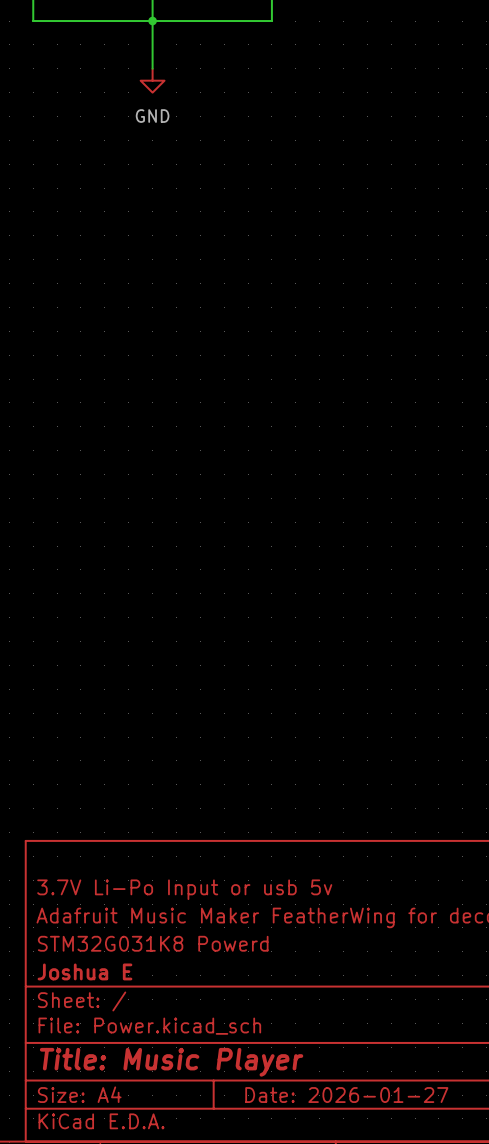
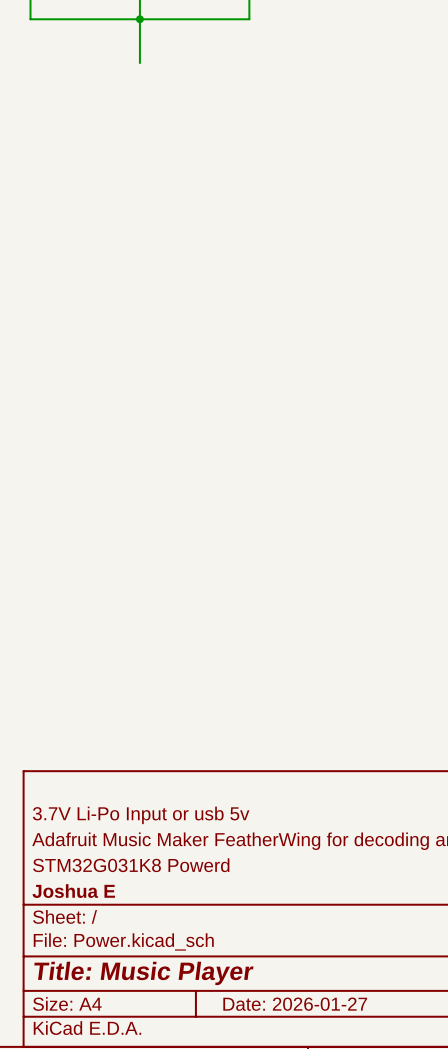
power symbol: GND (152, 80) -> none

